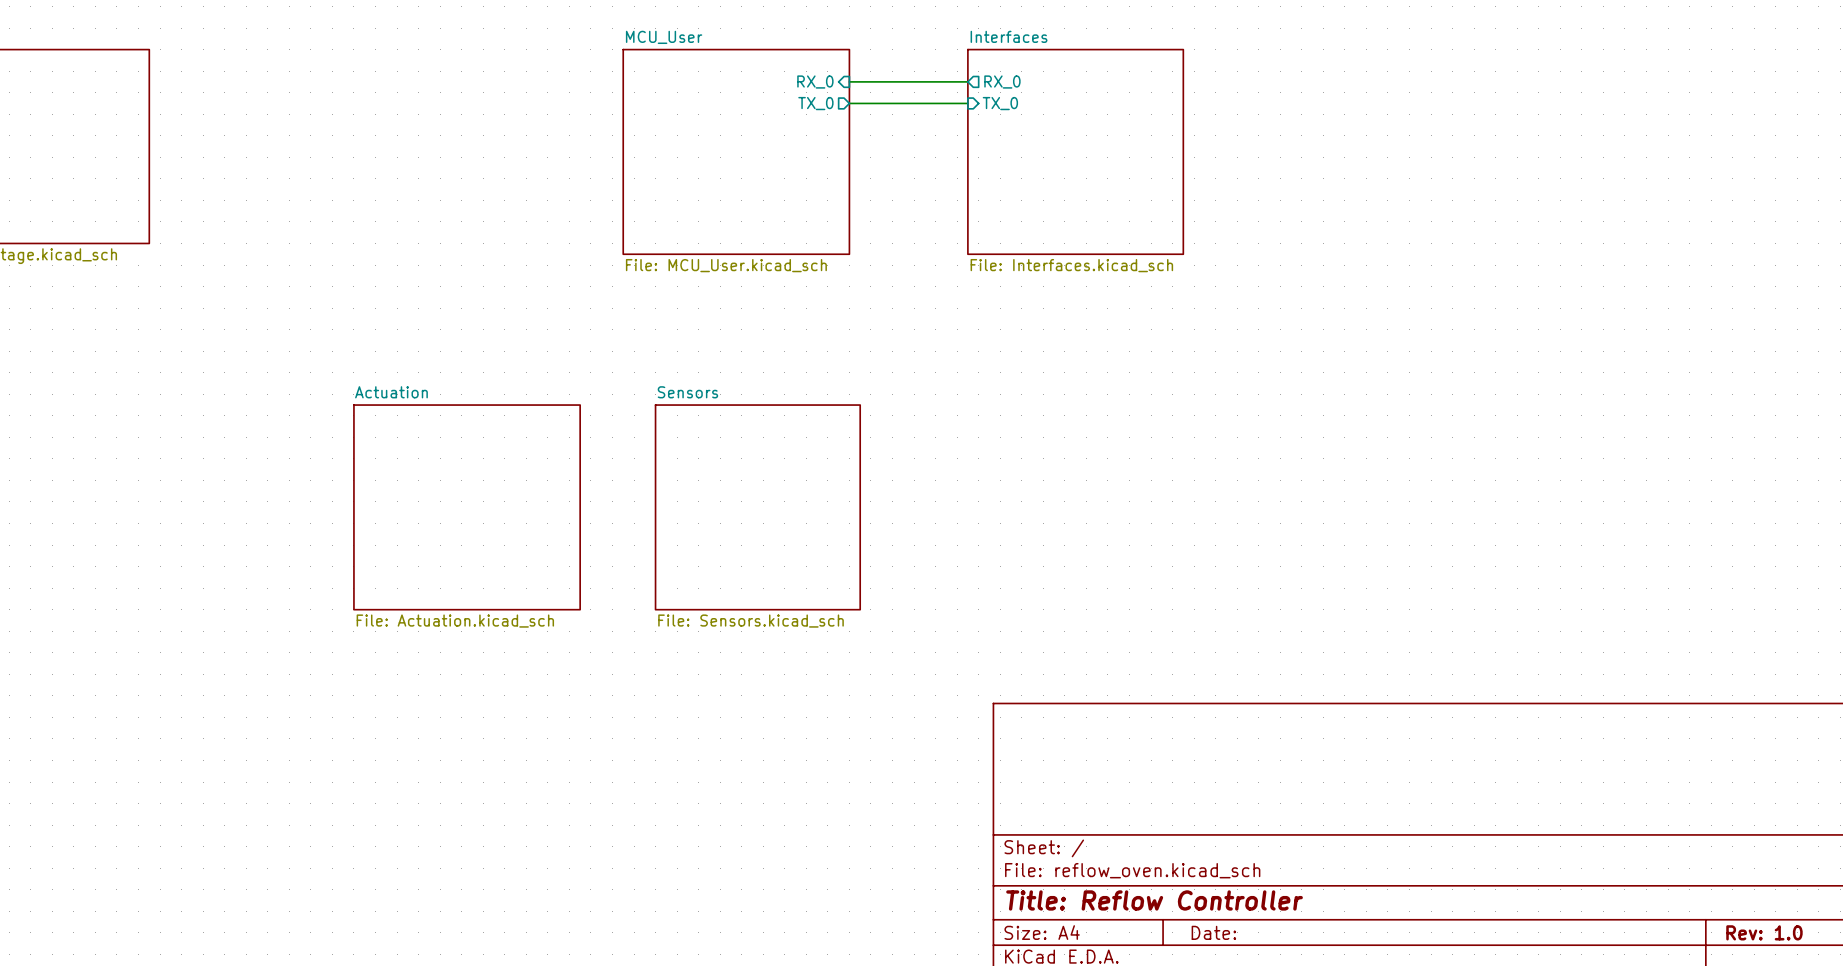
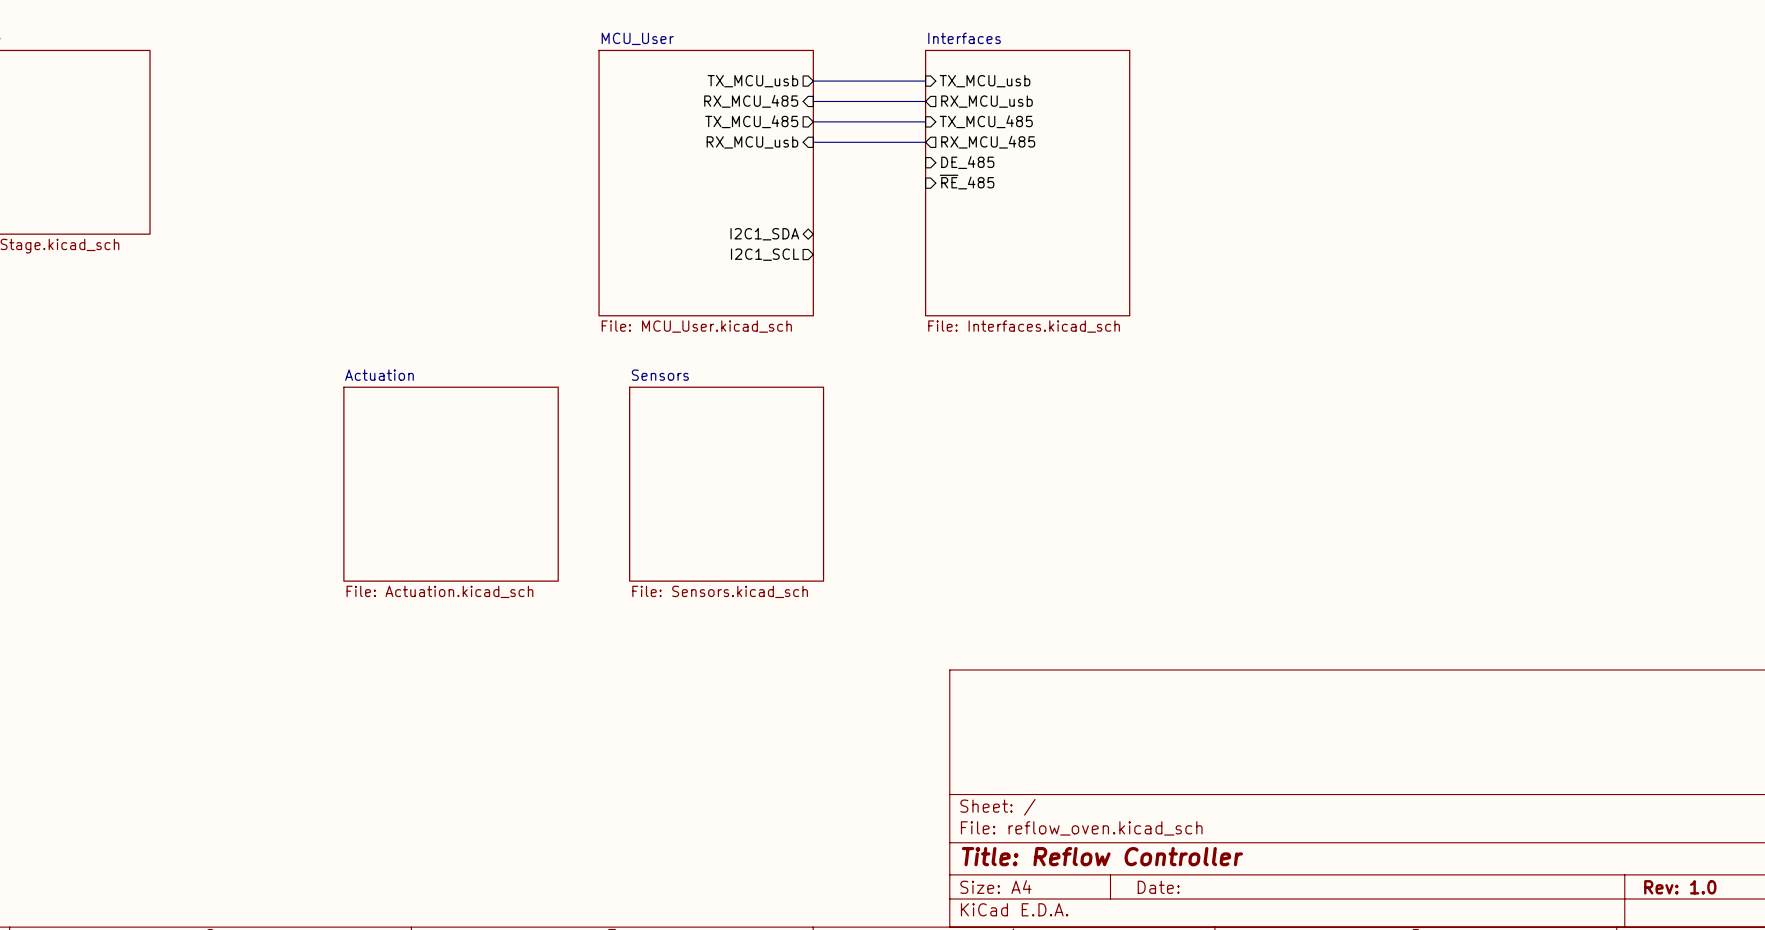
sheet pin shape: input (815, 82) -> output (752, 81)
sheet pin: RX_0 (815, 82) -> TX_MCU_usb (752, 81)
sheet pin shape: output (1002, 82) -> input (985, 81)
sheet pin: RX_0 (1002, 82) -> TX_MCU_usb (985, 81)
sheet pin shape: output (815, 103) -> input (751, 101)
sheet pin: TX_0 (815, 103) -> RX_MCU_485 (751, 101)
sheet pin shape: input (1000, 103) -> output (986, 101)
sheet pin: TX_0 (1000, 103) -> RX_MCU_usb (986, 101)
sheet pin: none -> TX_MCU_485 (751, 121)
wire: none -> (813, 121) (925, 121)
sheet pin: none -> TX_MCU_485 (986, 121)
sheet pin: none -> RX_MCU_usb (752, 142)
wire: none -> (813, 142) (925, 142)
sheet pin: none -> RX_MCU_485 (988, 142)
sheet MCU_User: File: MCU_User.kicad_sch (736, 151) -> none
sheet Interfaces: File: Interfaces.kicad_sch (1075, 151) -> none
sheet pin: none -> DE_485 (967, 162)
sheet pin: none -> ~{RE}_485 (967, 182)
sheet MCU_User: none -> File: MCU_User.kicad_sch (706, 183)
sheet Interfaces: none -> File: Interfaces.kicad_sch (1027, 183)
sheet pin: none -> I2C1_SDA (764, 234)
sheet pin: none -> I2C1_SCL (765, 254)

